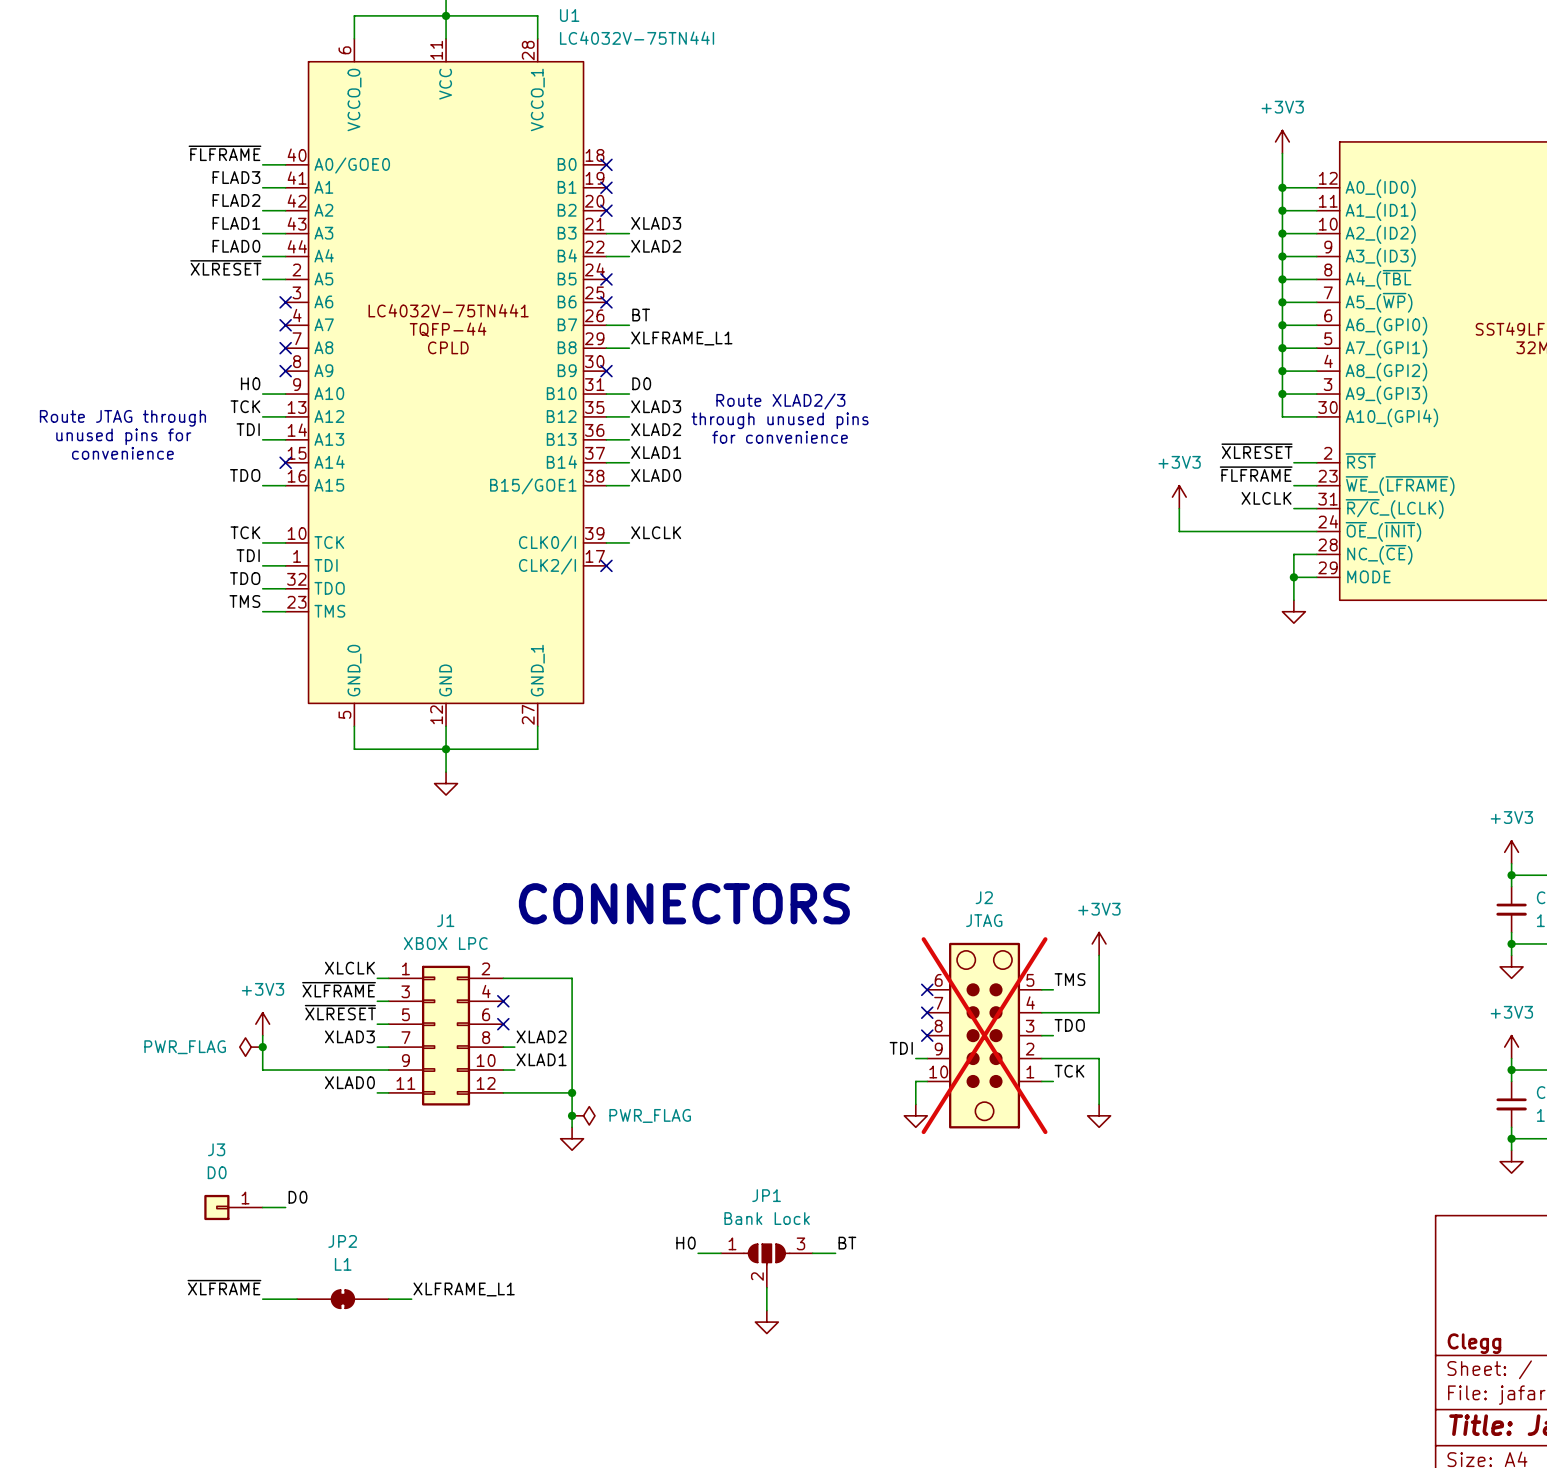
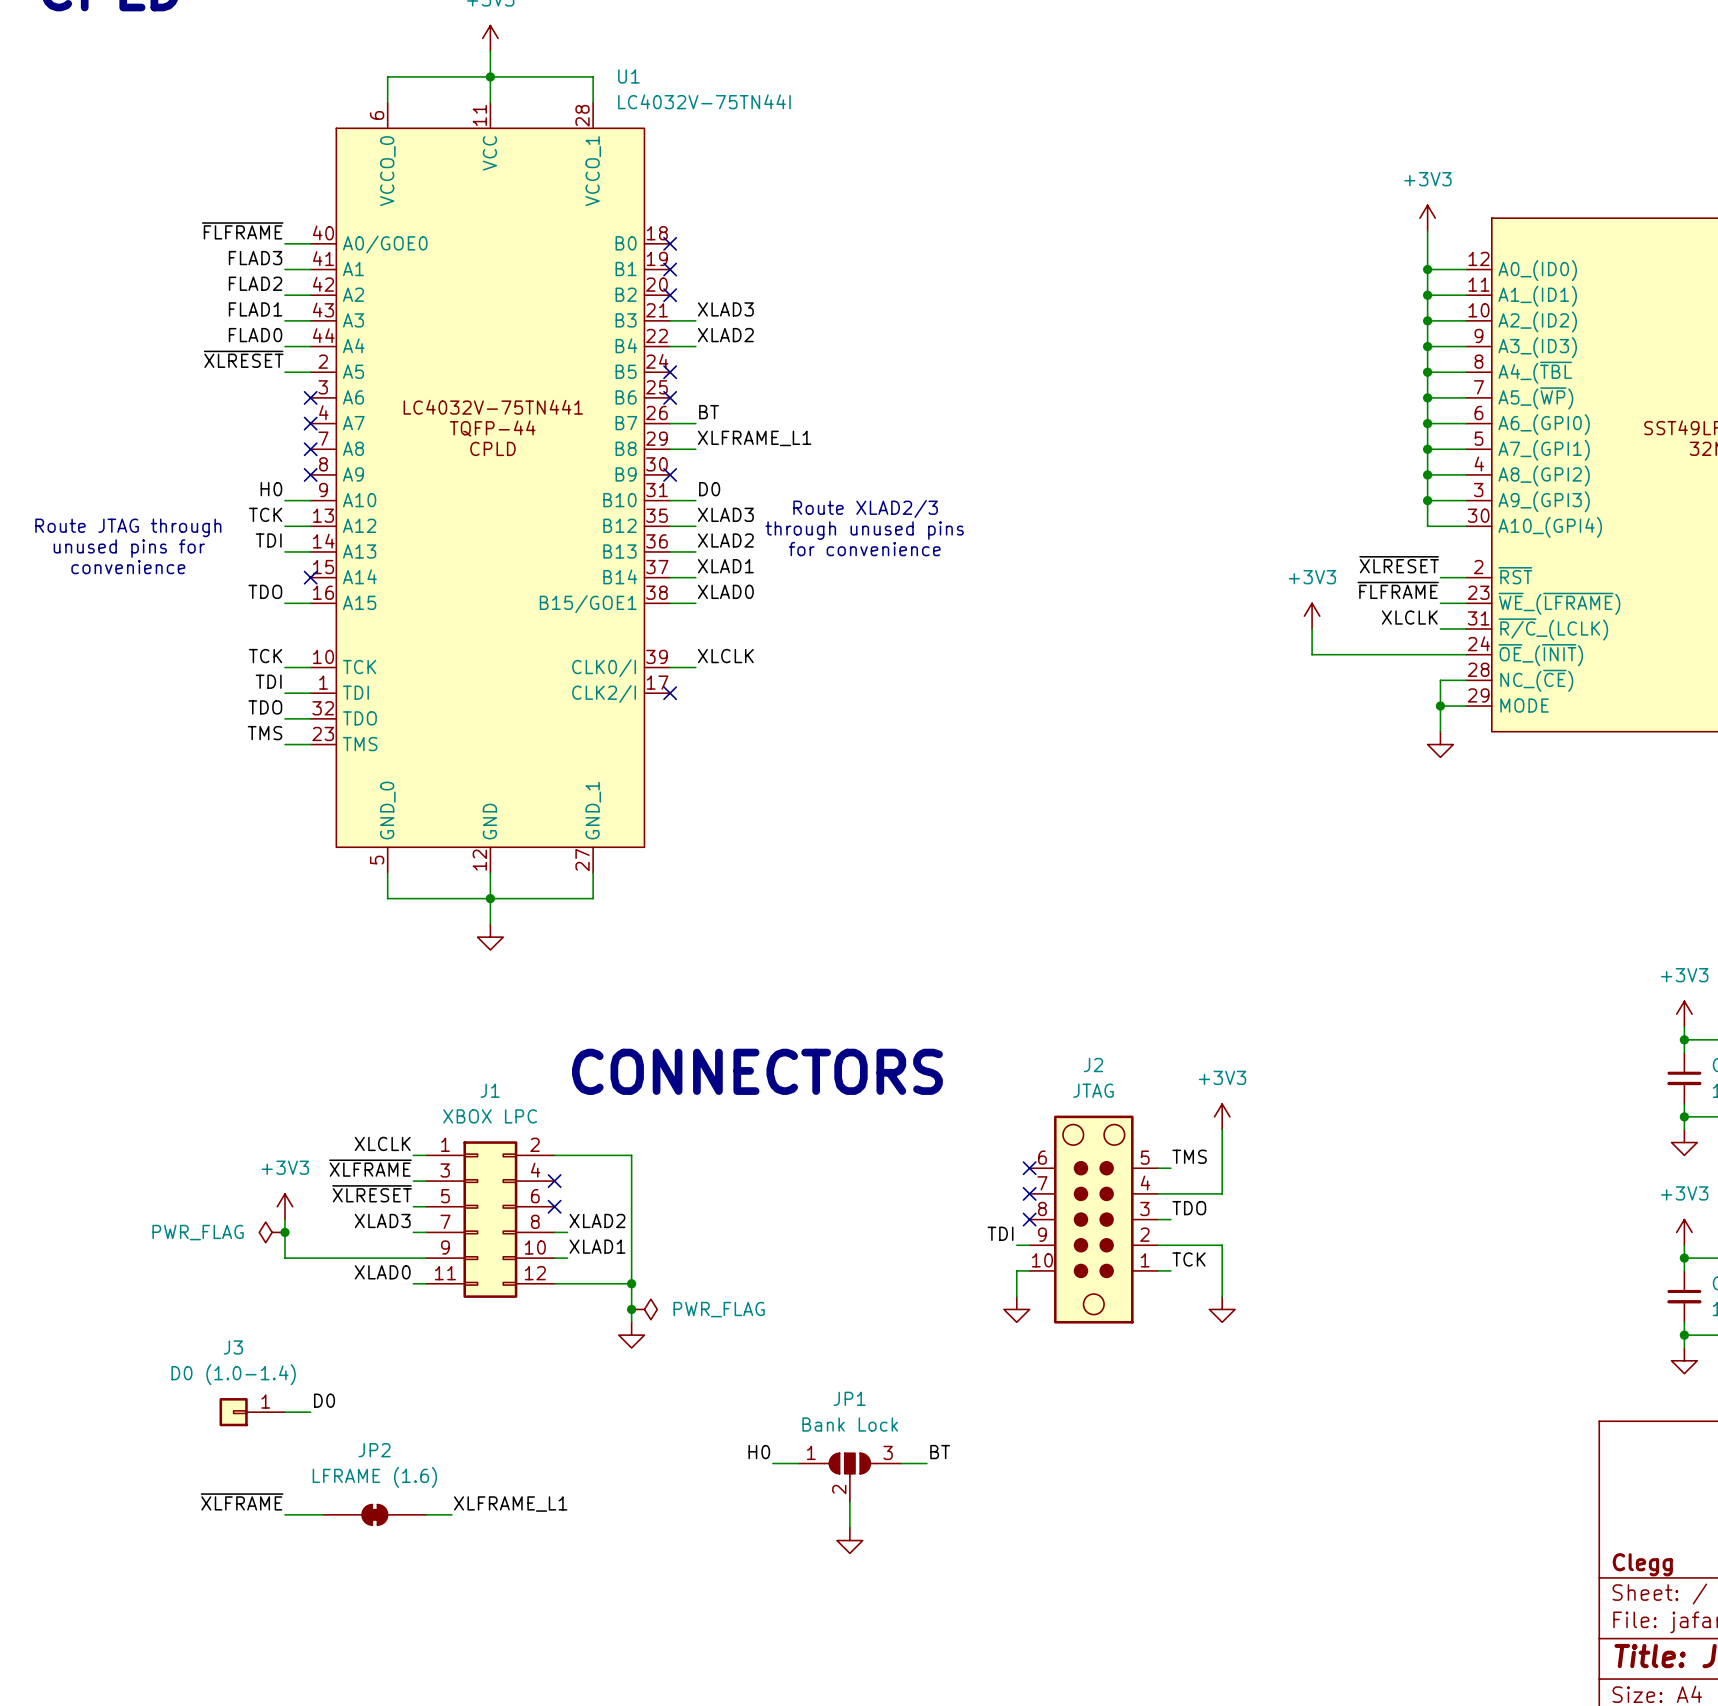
J2 do-not-place cross: (984, 1035) -> none
J3 value: D0 (217, 1172) -> D0 (1.0-1.4) (233, 1374)
JP2 value: L1 (343, 1264) -> LFRAME (1.6) (374, 1477)

